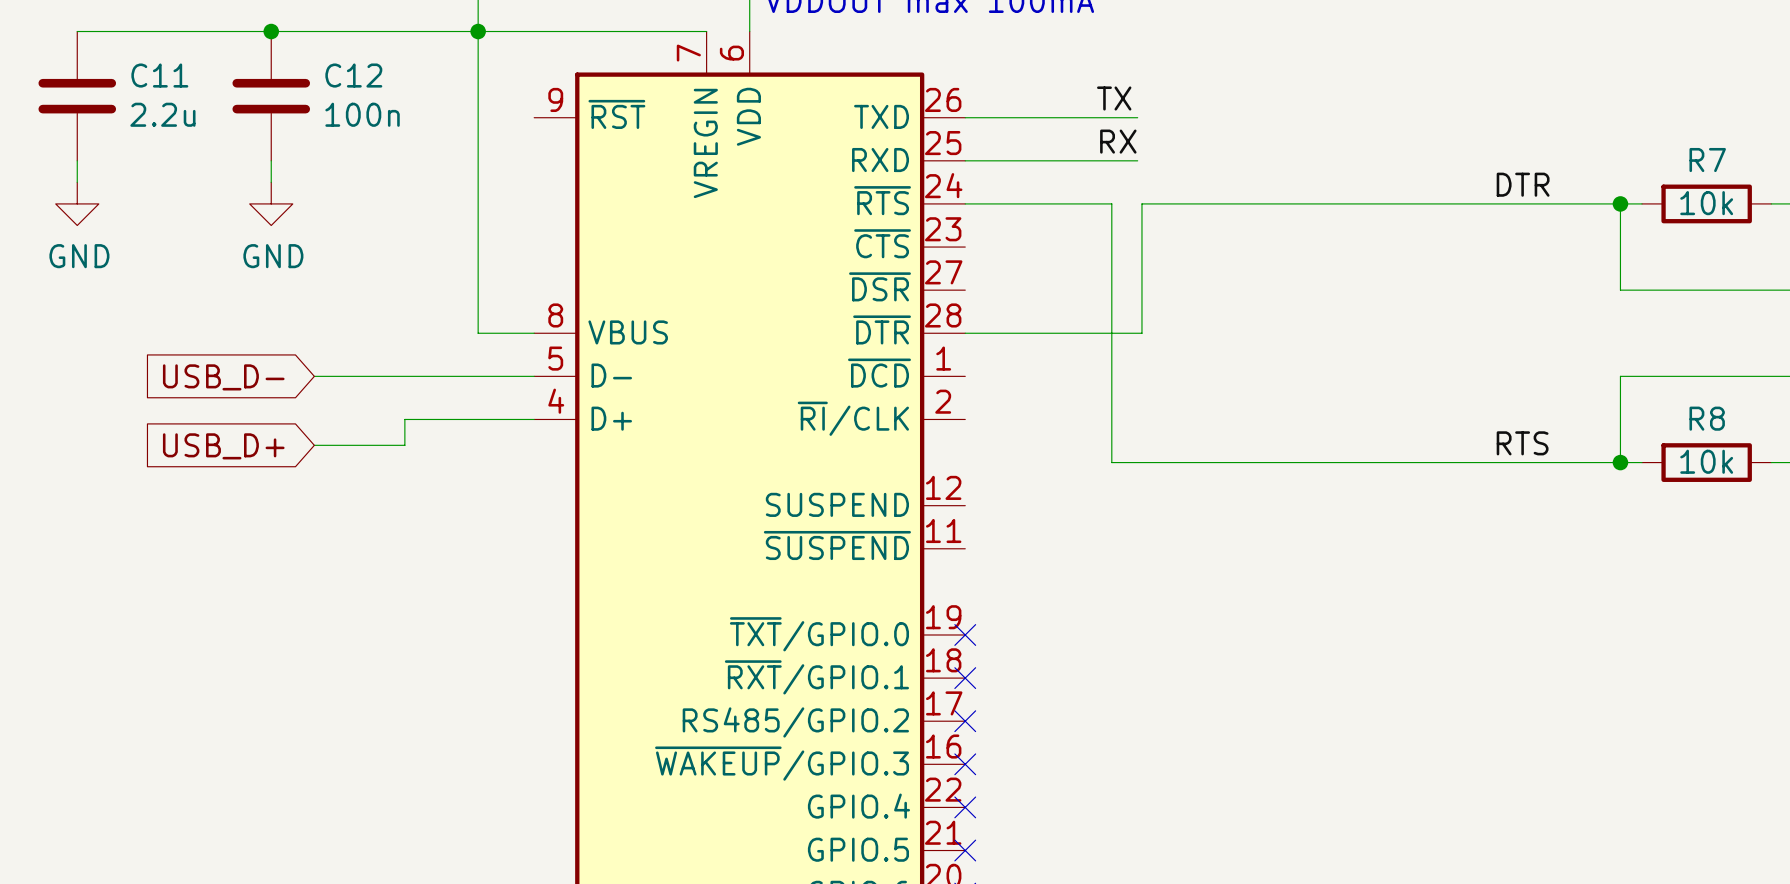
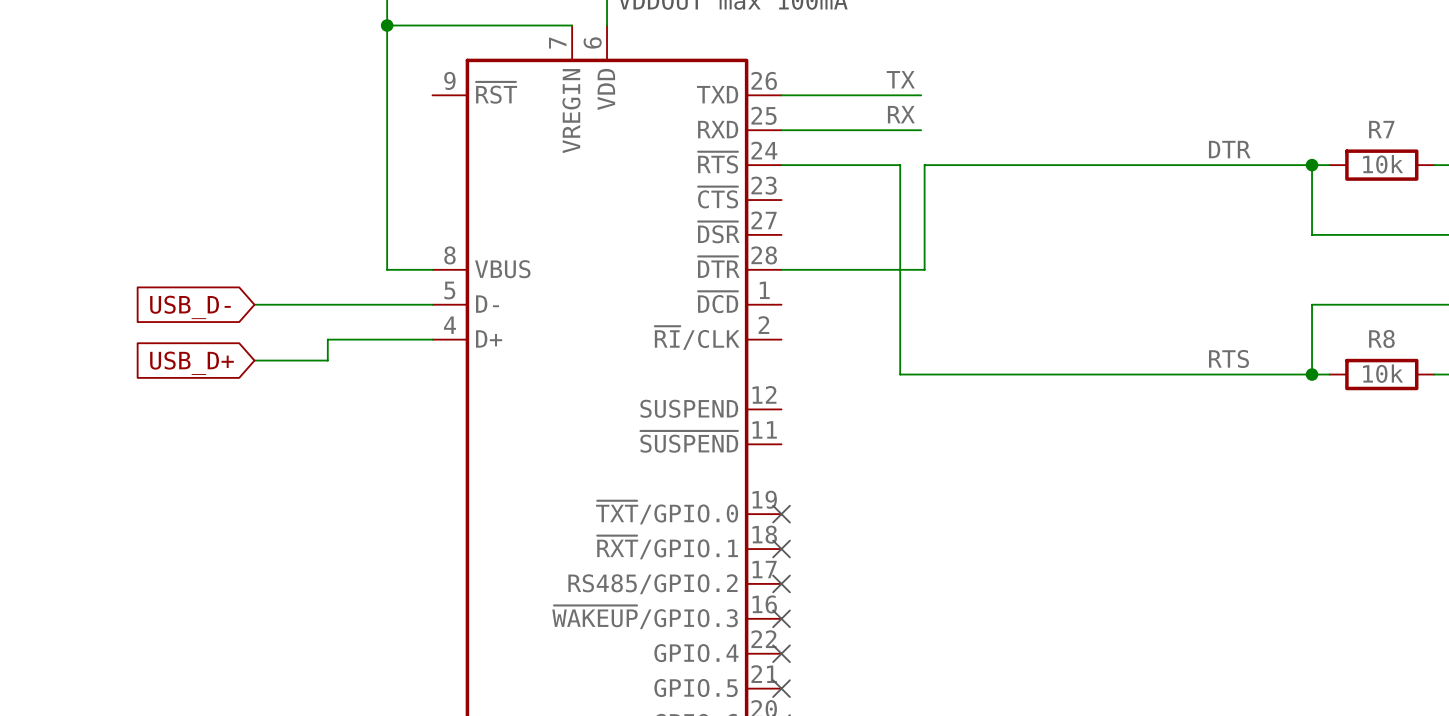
wire: (77, 31) (478, 31) -> none
junction: (271, 31) -> none
C11: 2.2u (77, 96) -> none
C12: 100n (271, 96) -> none
wire: (77, 160) (77, 182) -> none
wire: (271, 160) (271, 182) -> none
power symbol: GND (77, 203) -> none
power symbol: GND (271, 203) -> none

